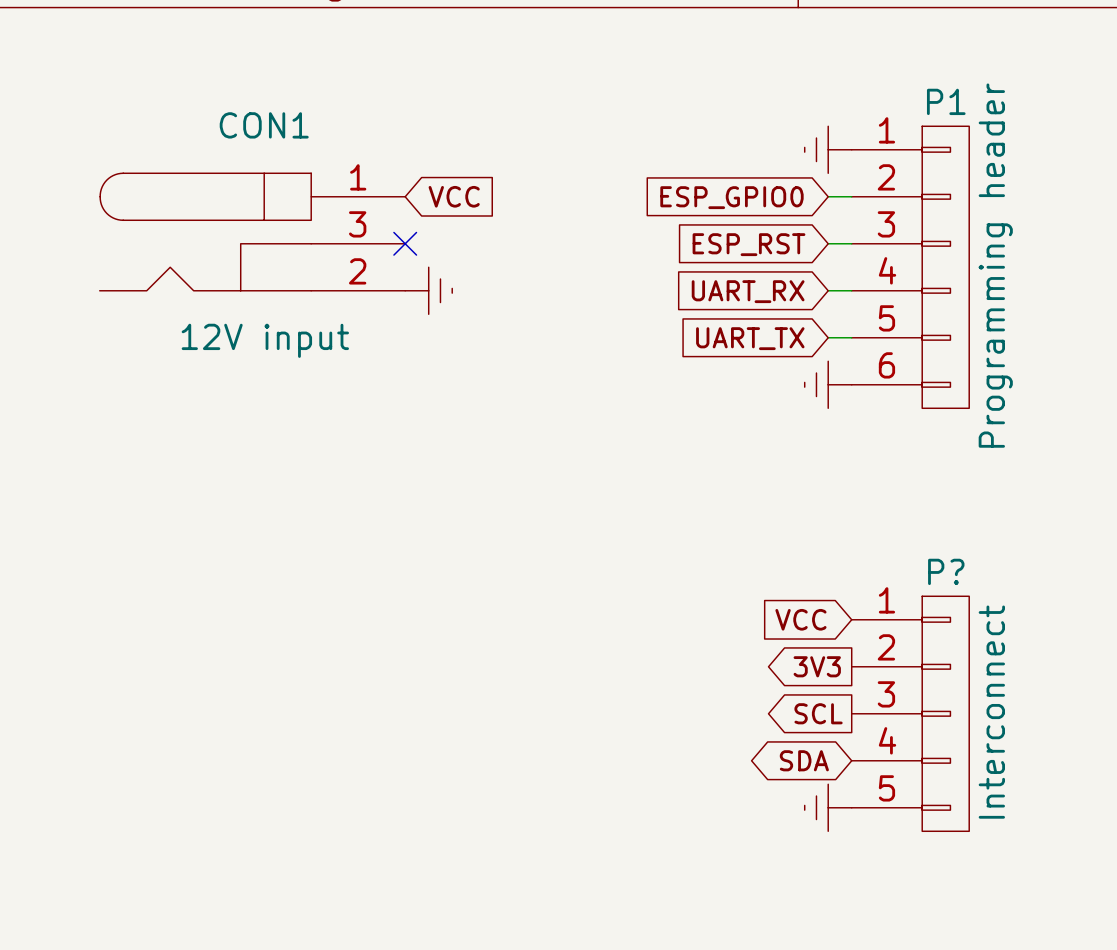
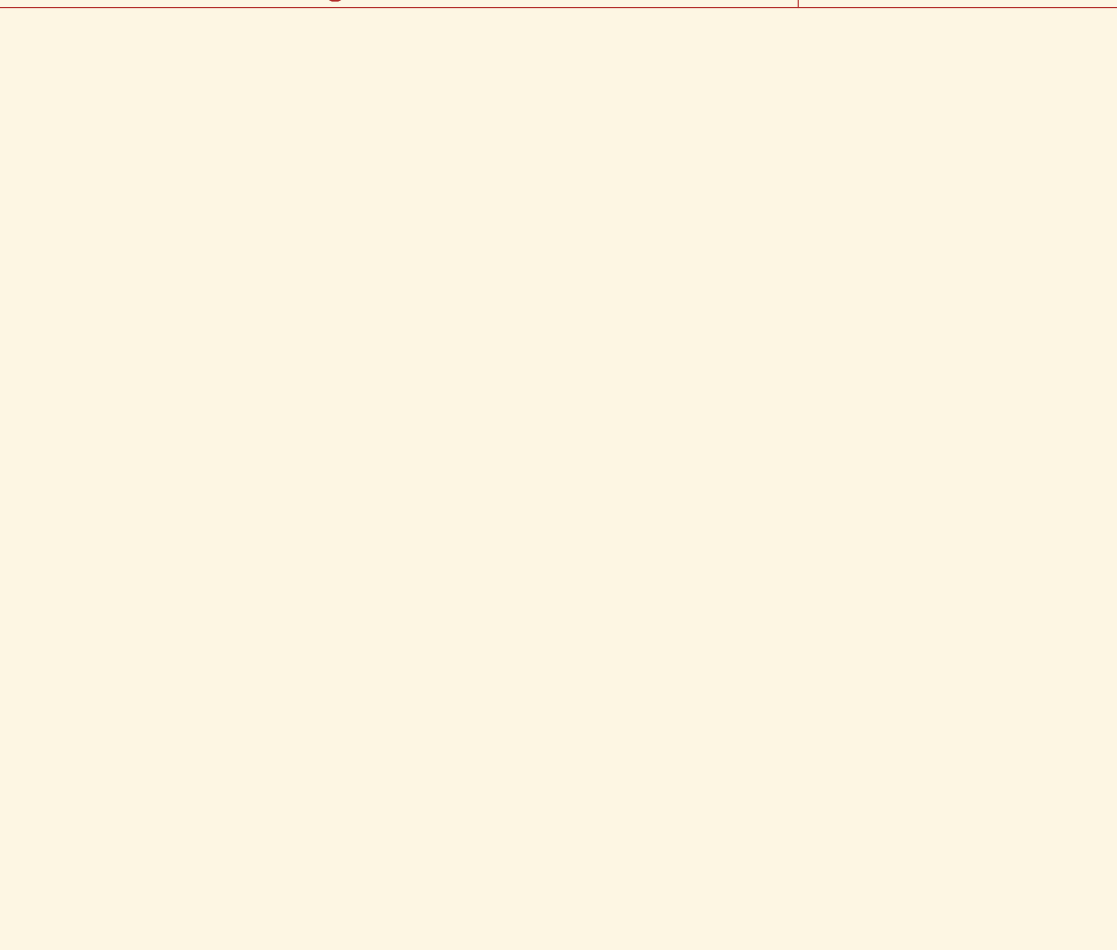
power symbol: (828, 149) -> none
global label: VCC (454, 196) -> none
wire: (828, 196) (851, 196) -> none
global label: ESP_GPIO0 (731, 197) -> none
CON1: 12V input (252, 232) -> none
no-connect mark: (405, 243) -> none
wire: (828, 243) (851, 243) -> none
global label: ESP_RST (749, 244) -> none
P1: Programming header (910, 267) -> none
power symbol: (428, 290) -> none
wire: (828, 290) (851, 290) -> none
global label: UART_RX (748, 291) -> none
wire: (828, 337) (851, 337) -> none
global label: UART_TX (750, 338) -> none
power symbol: (828, 384) -> none
global label: VCC (800, 619) -> none
global label: 3V3 (817, 666) -> none
global label: SCL (818, 713) -> none
P?: Interconnect (910, 713) -> none
global label: SDA (804, 760) -> none
power symbol: (828, 807) -> none

